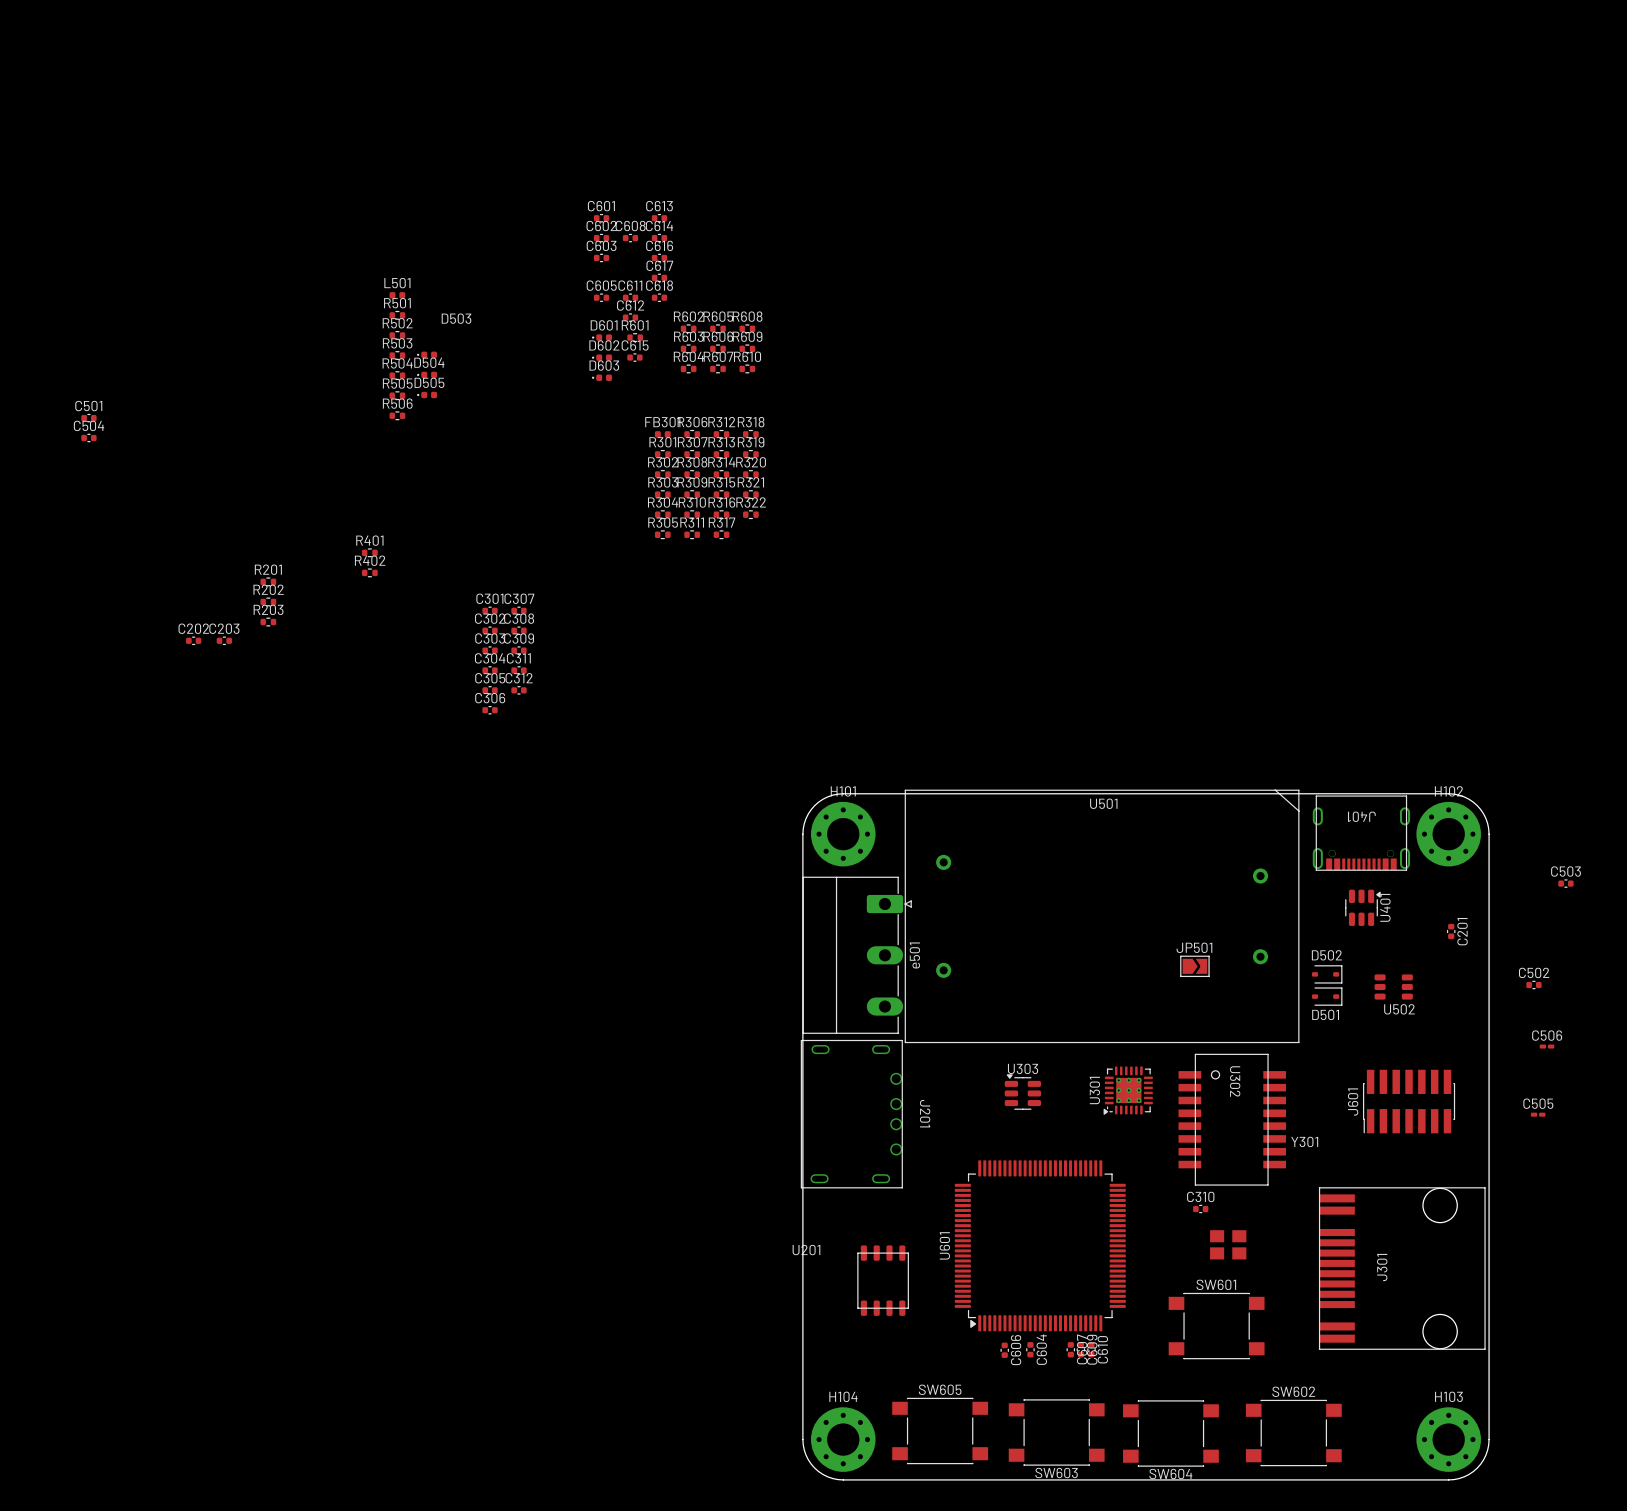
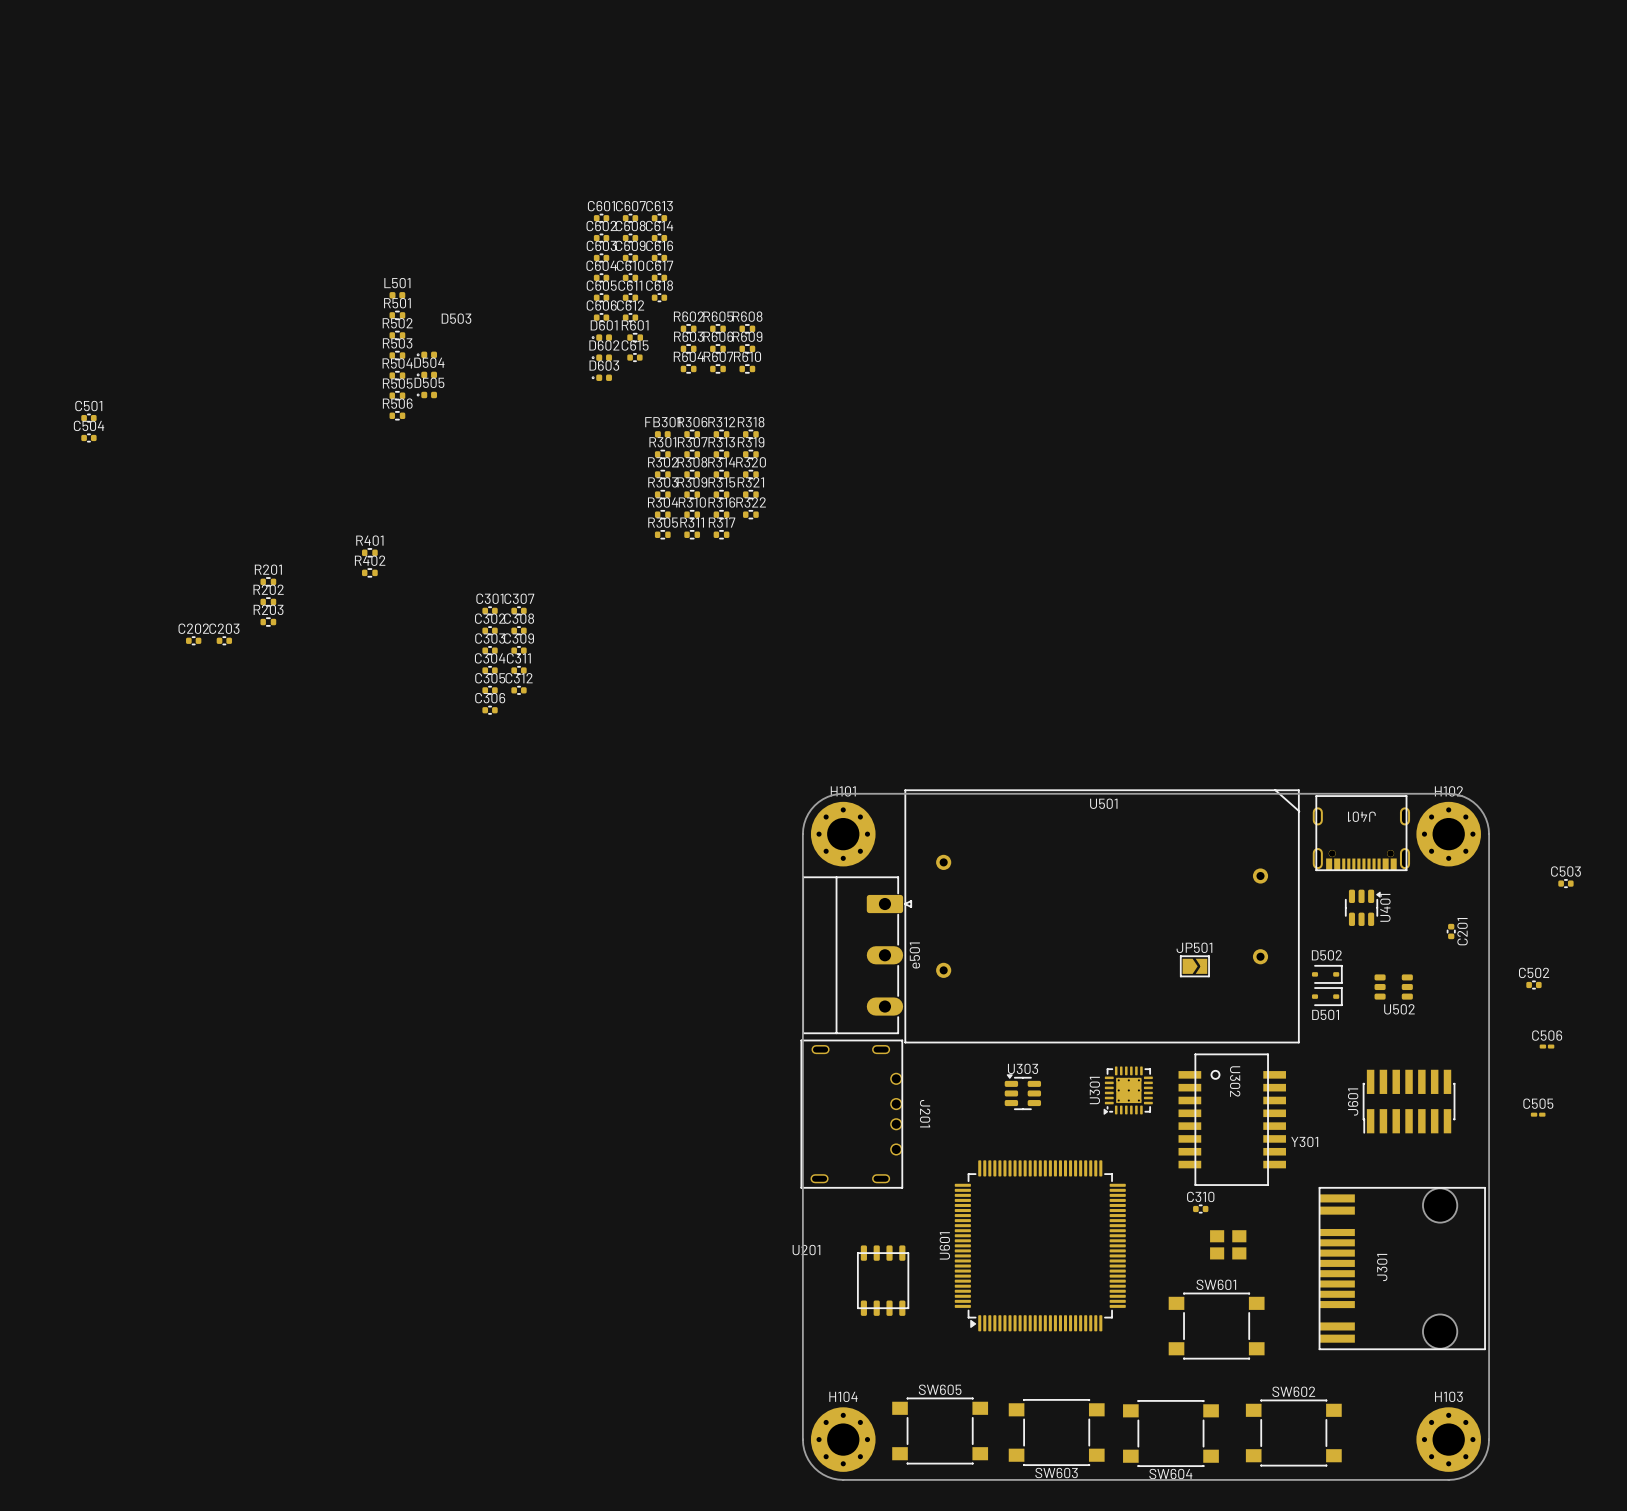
C604 rotation: 0° (1030, 1349) -> 90° clockwise (601, 277)
C604 position: (1030, 1349) -> (601, 277)
C607 rotation: 0° (1070, 1349) -> 90° clockwise (630, 218)
C607 position: (1070, 1349) -> (630, 218)
C609 rotation: 0° (1080, 1349) -> 90° clockwise (630, 257)
C609 position: (1080, 1349) -> (630, 257)
C610 rotation: 0° (1091, 1349) -> 90° clockwise (630, 277)
C610 position: (1091, 1349) -> (630, 277)
C606 rotation: 0° (1004, 1350) -> 90° clockwise (601, 317)
C606 position: (1004, 1350) -> (601, 317)

